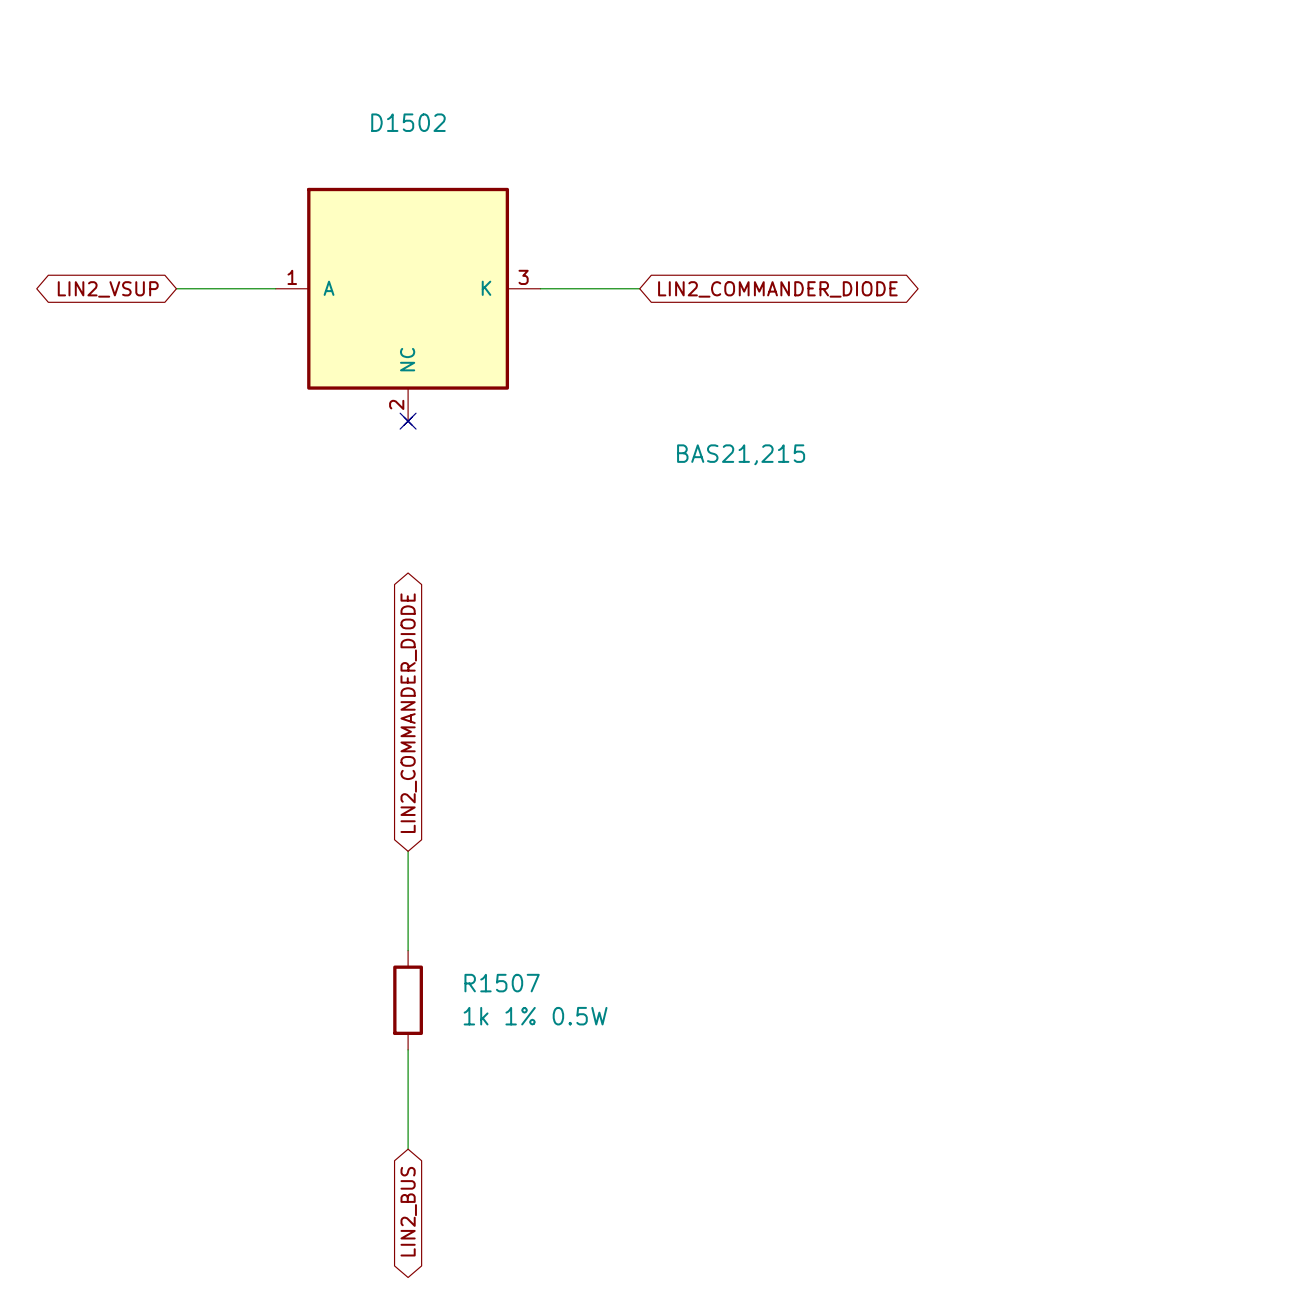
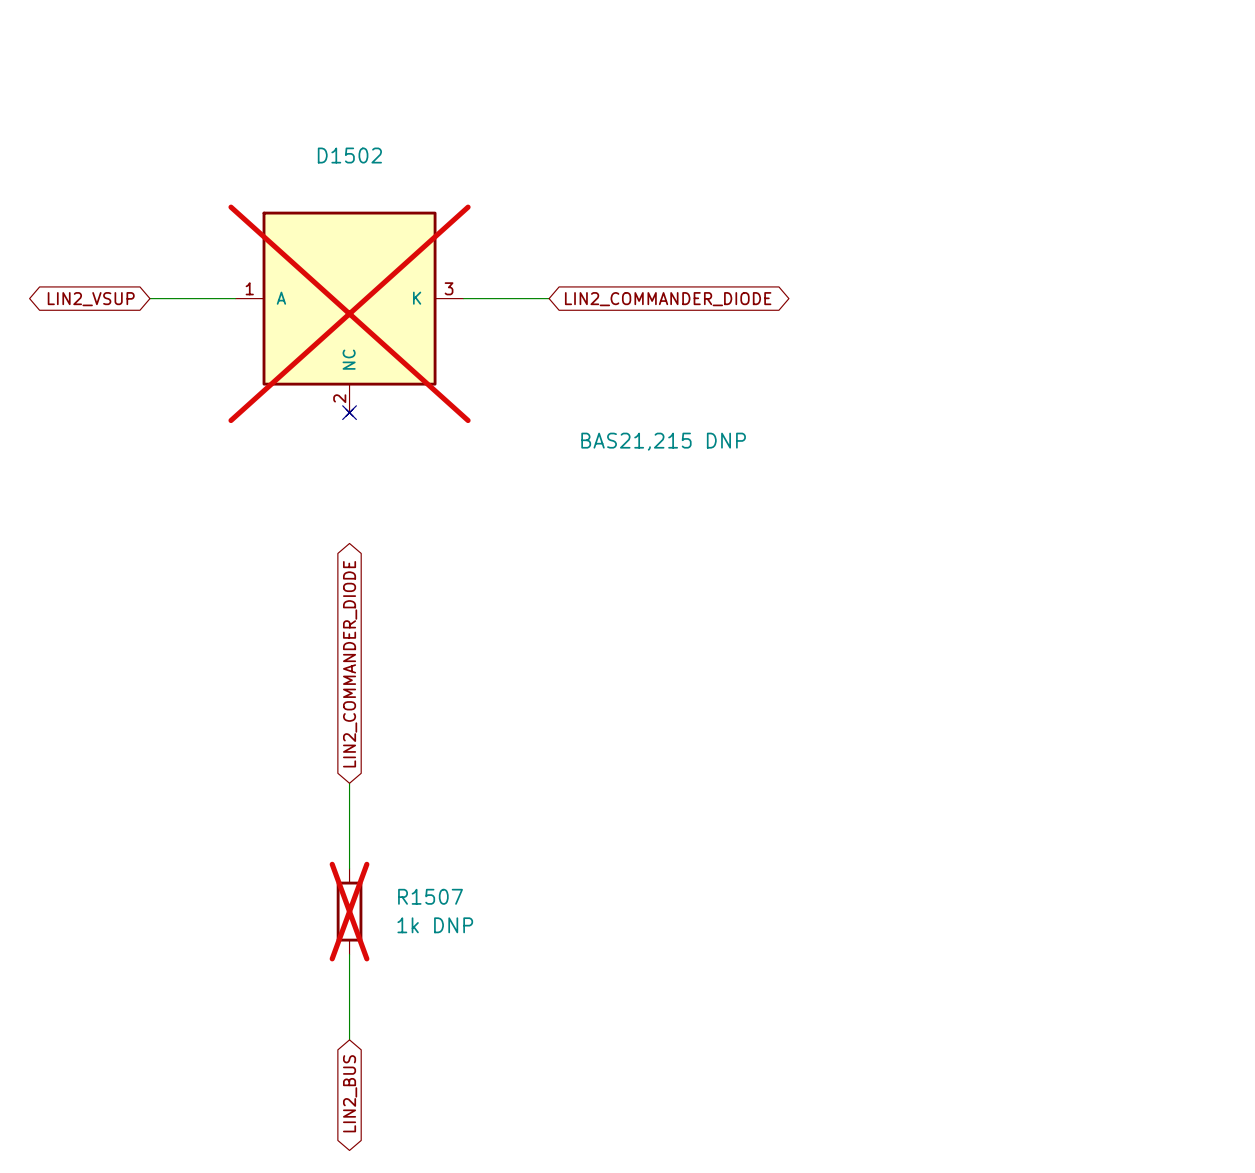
D1502 do-not-place cross: none -> (349, 313)
D1502 value: BAS21,215 (741, 454) -> BAS21,215 DNP (663, 441)
R1507 do-not-place cross: none -> (349, 911)
R1507 value: 1k 1% 0.5W (535, 1016) -> 1k DNP (435, 925)

